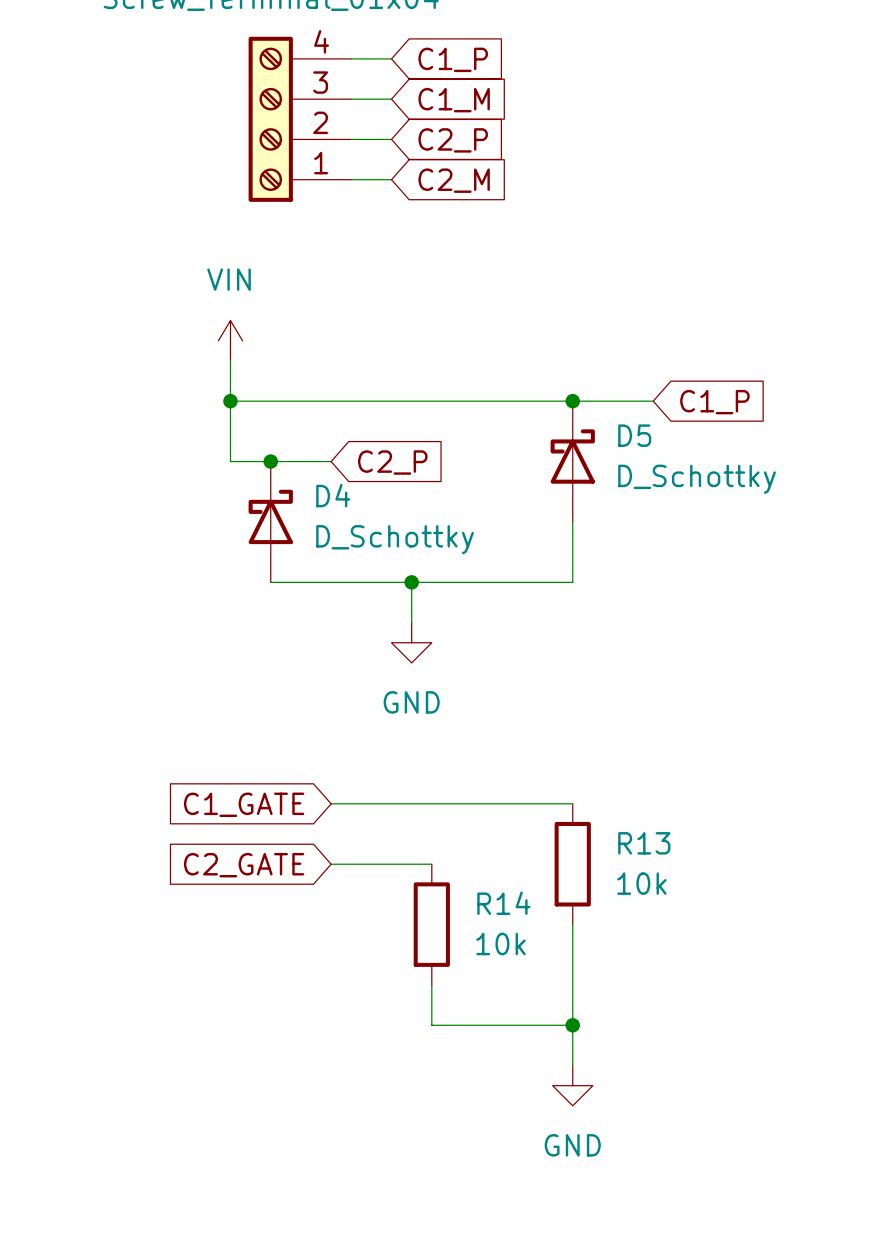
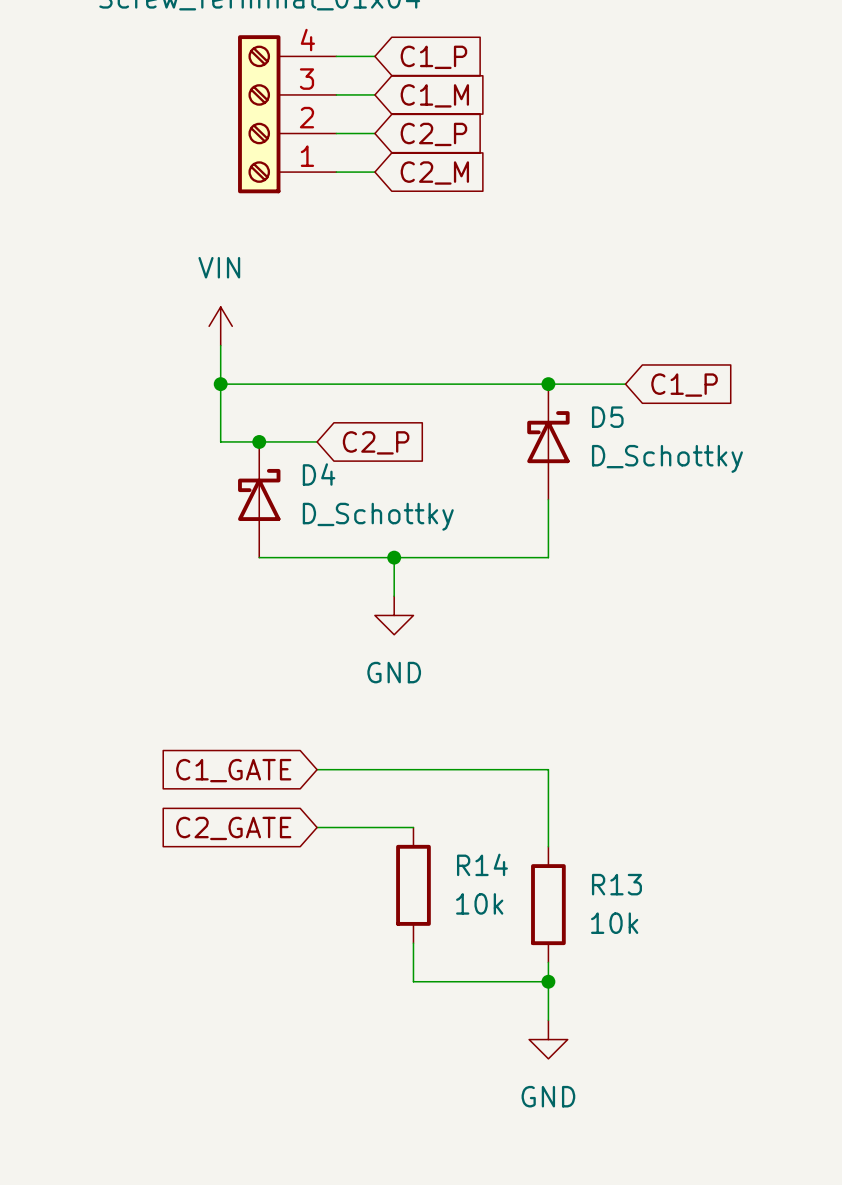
R13 position: (572, 864) -> (548, 904)
wire: (572, 924) (572, 1005) -> (548, 769) (548, 846)

